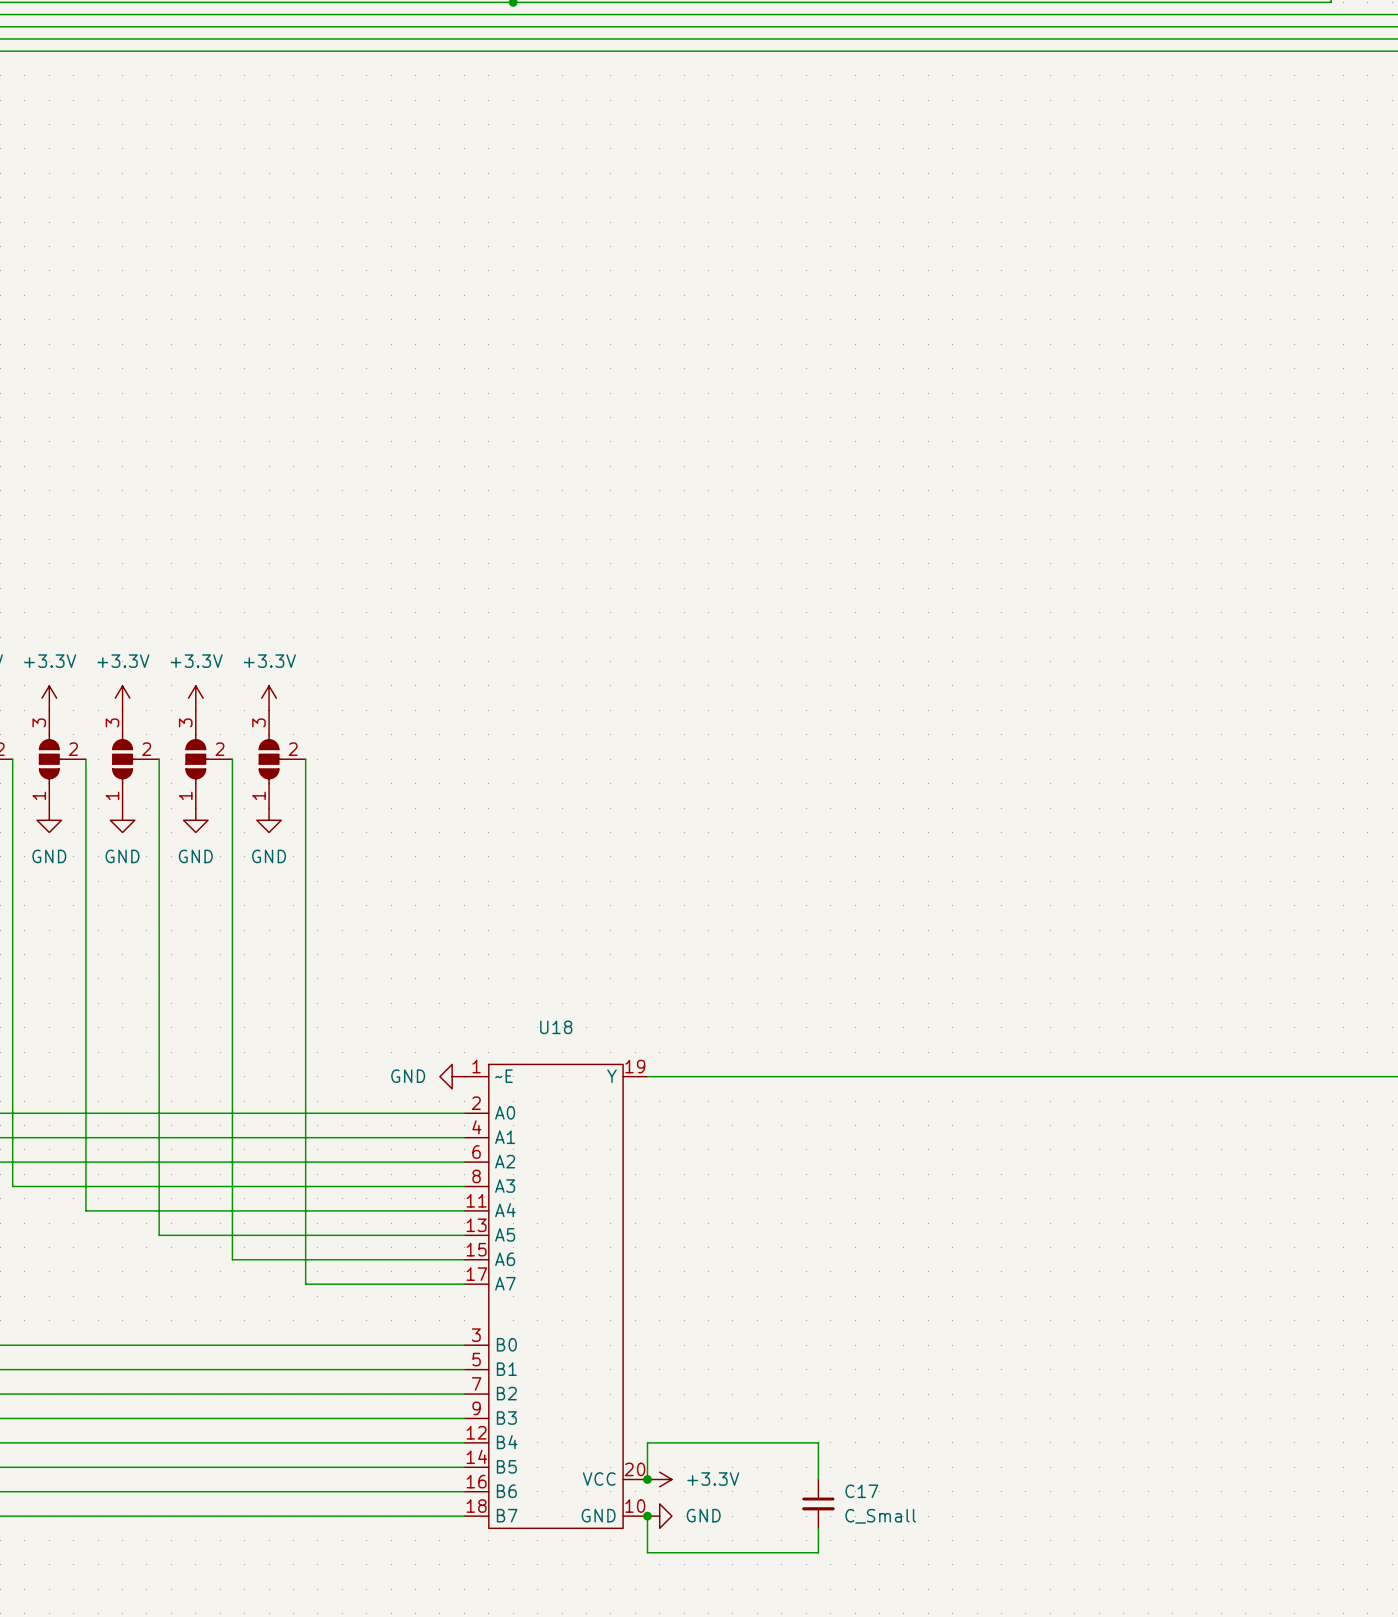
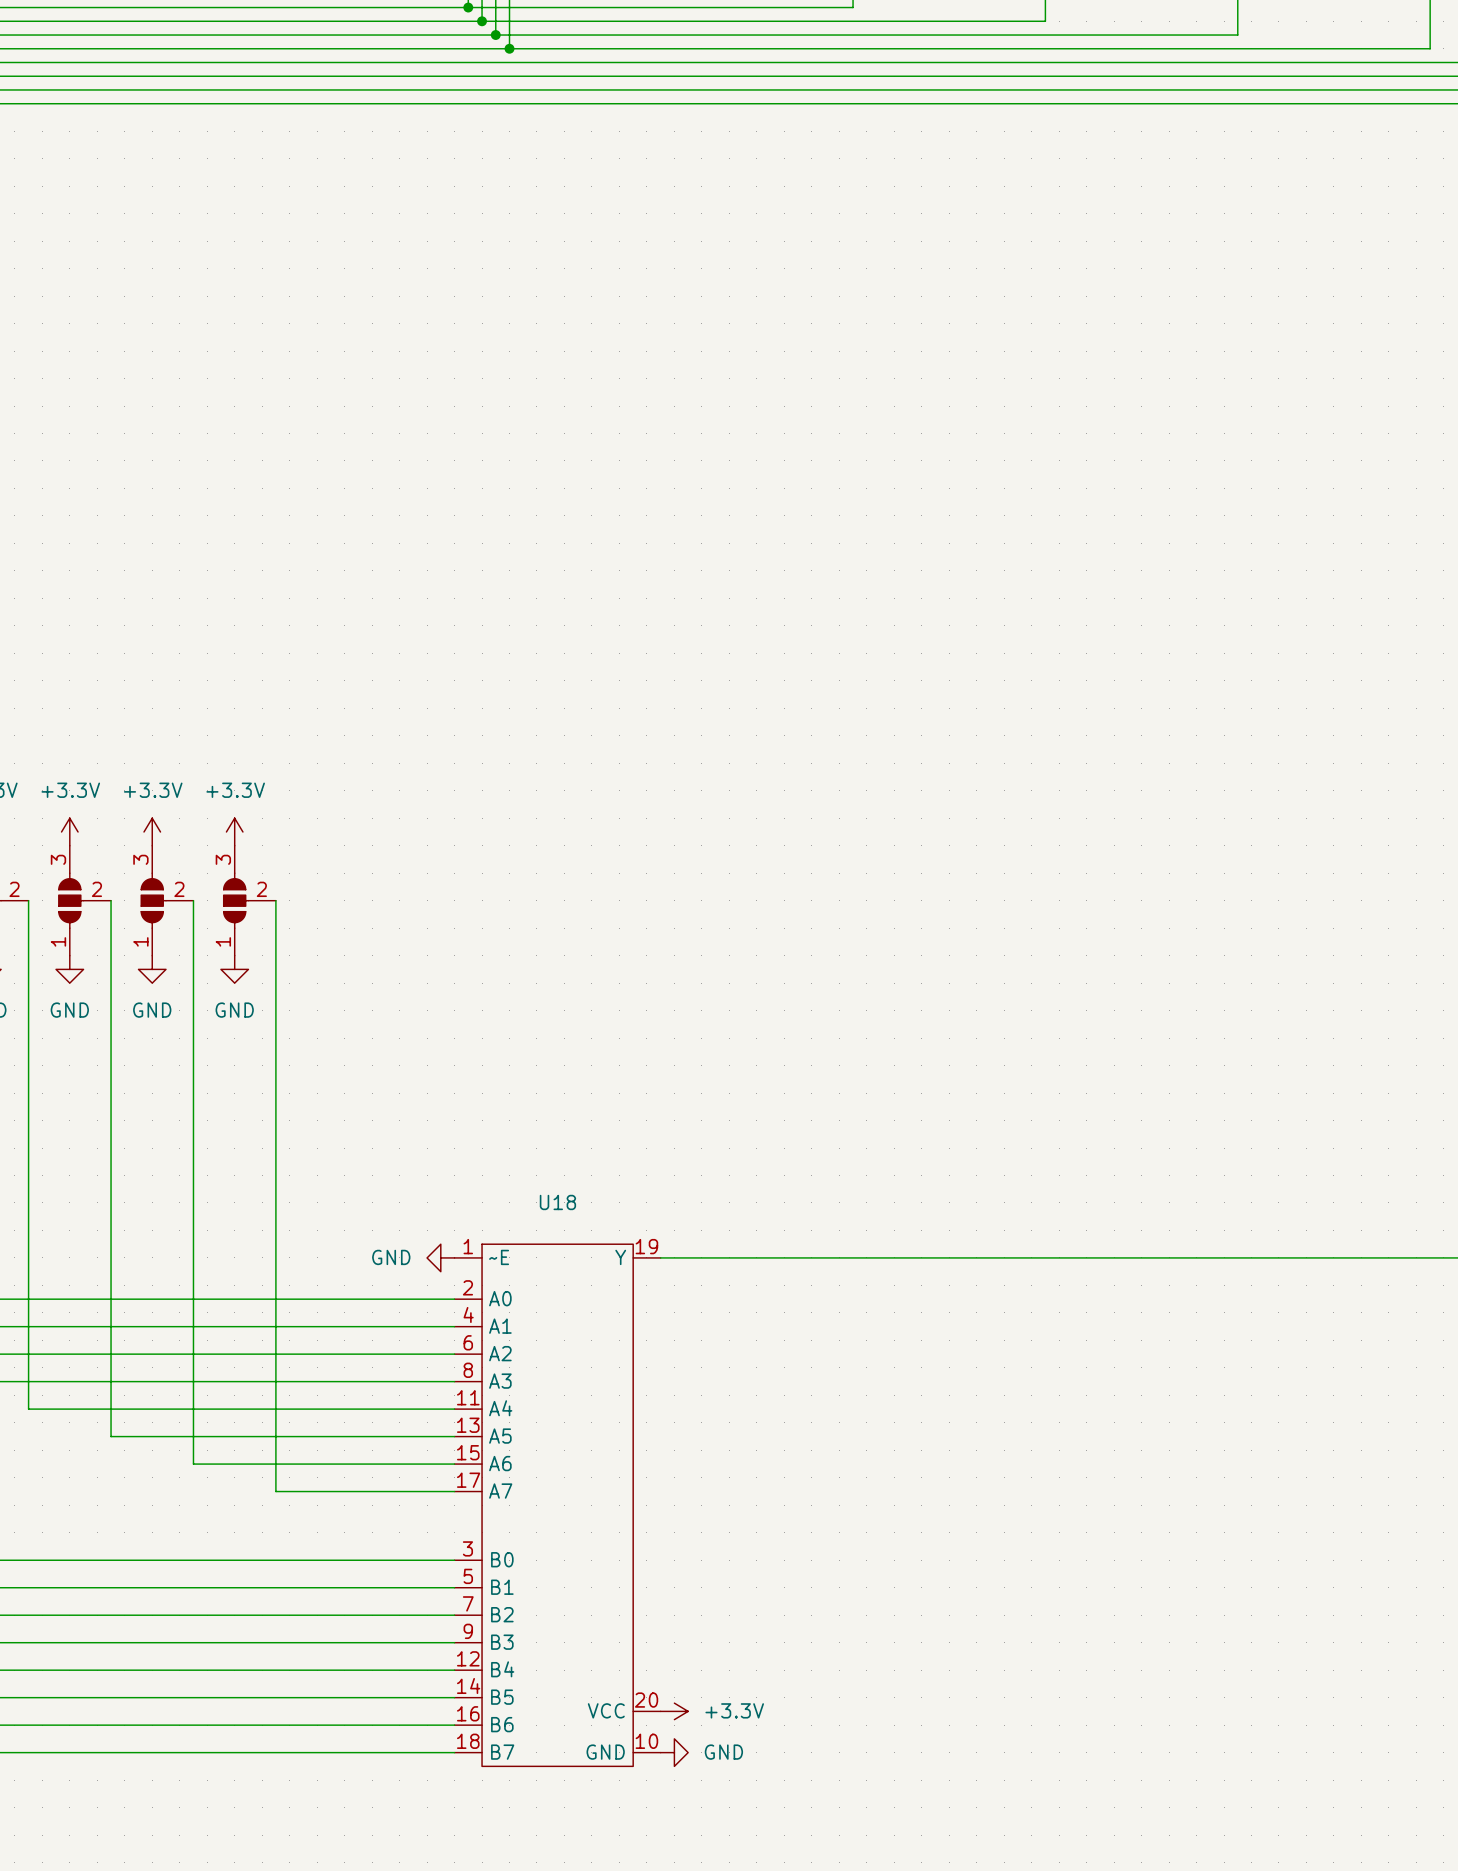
wire: (647, 1479) (647, 1442) (818, 1442) (818, 1479) -> none
junction: (647, 1479) -> none
C17: C_Small (818, 1503) -> none
wire: (647, 1516) (647, 1552) (818, 1552) (818, 1528) -> none
junction: (647, 1516) -> none

